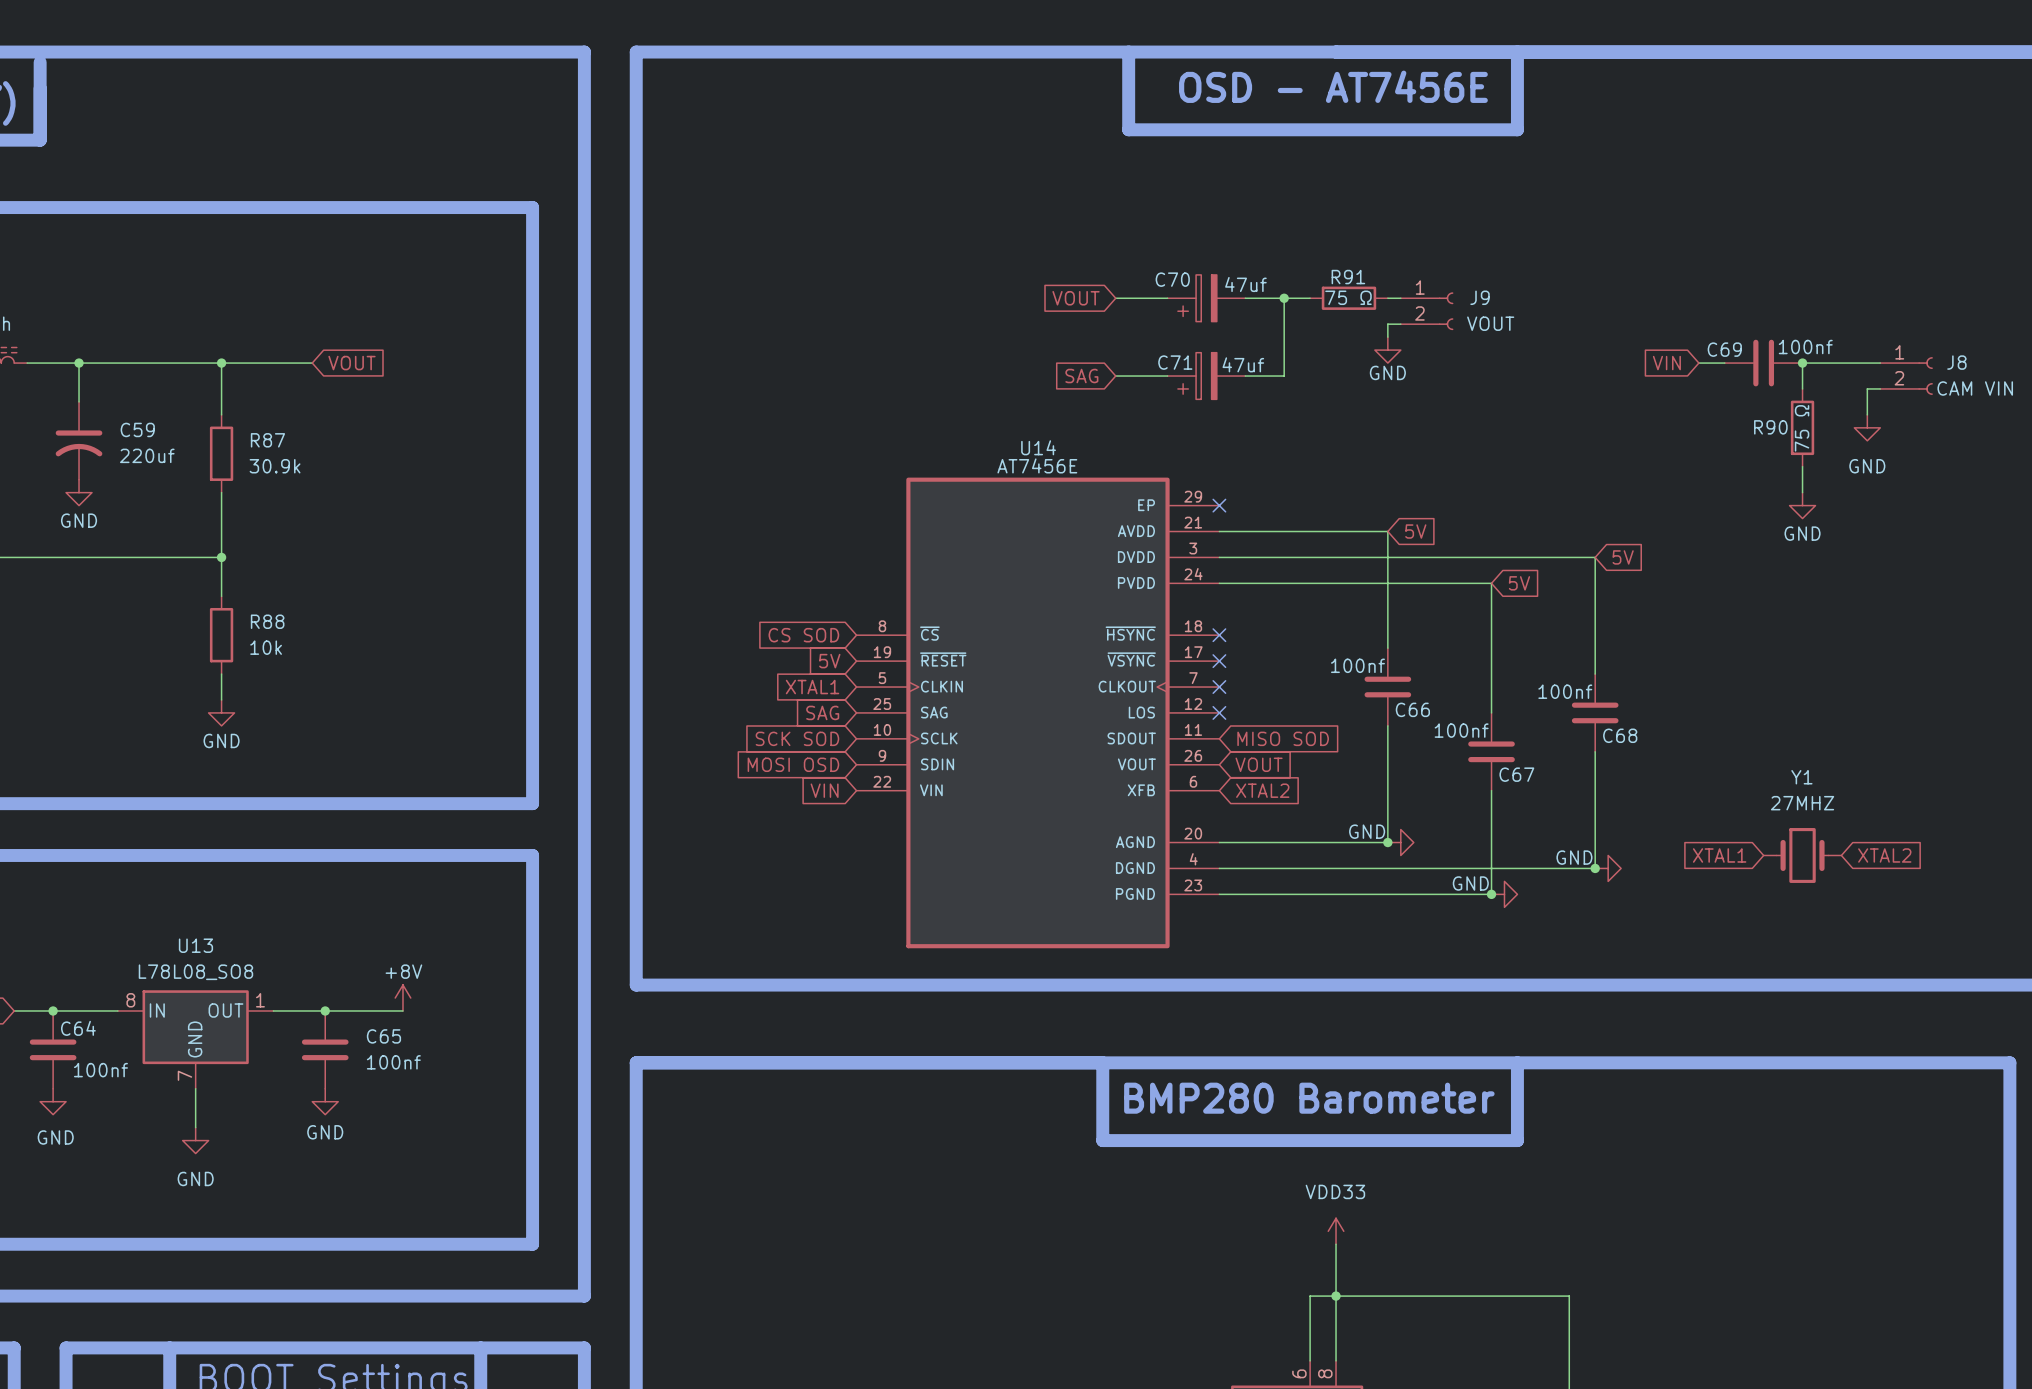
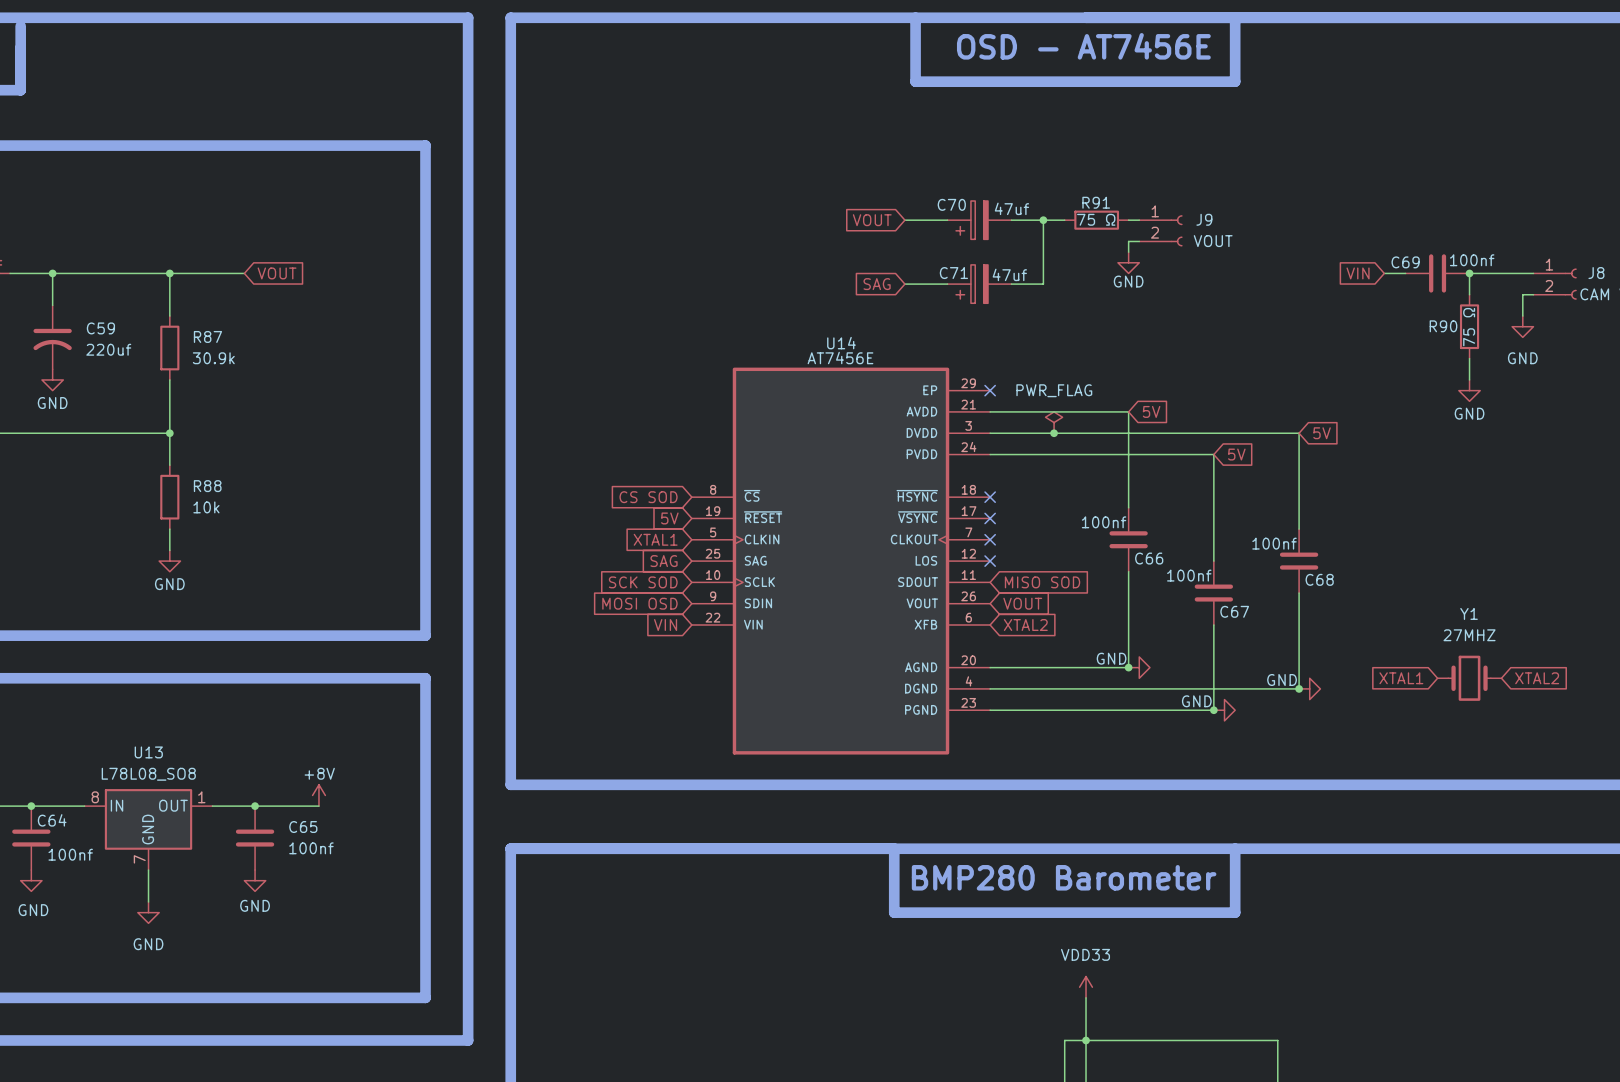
power symbol: none -> PWR_FLAG (1054, 422)
junction: none -> (1054, 433)

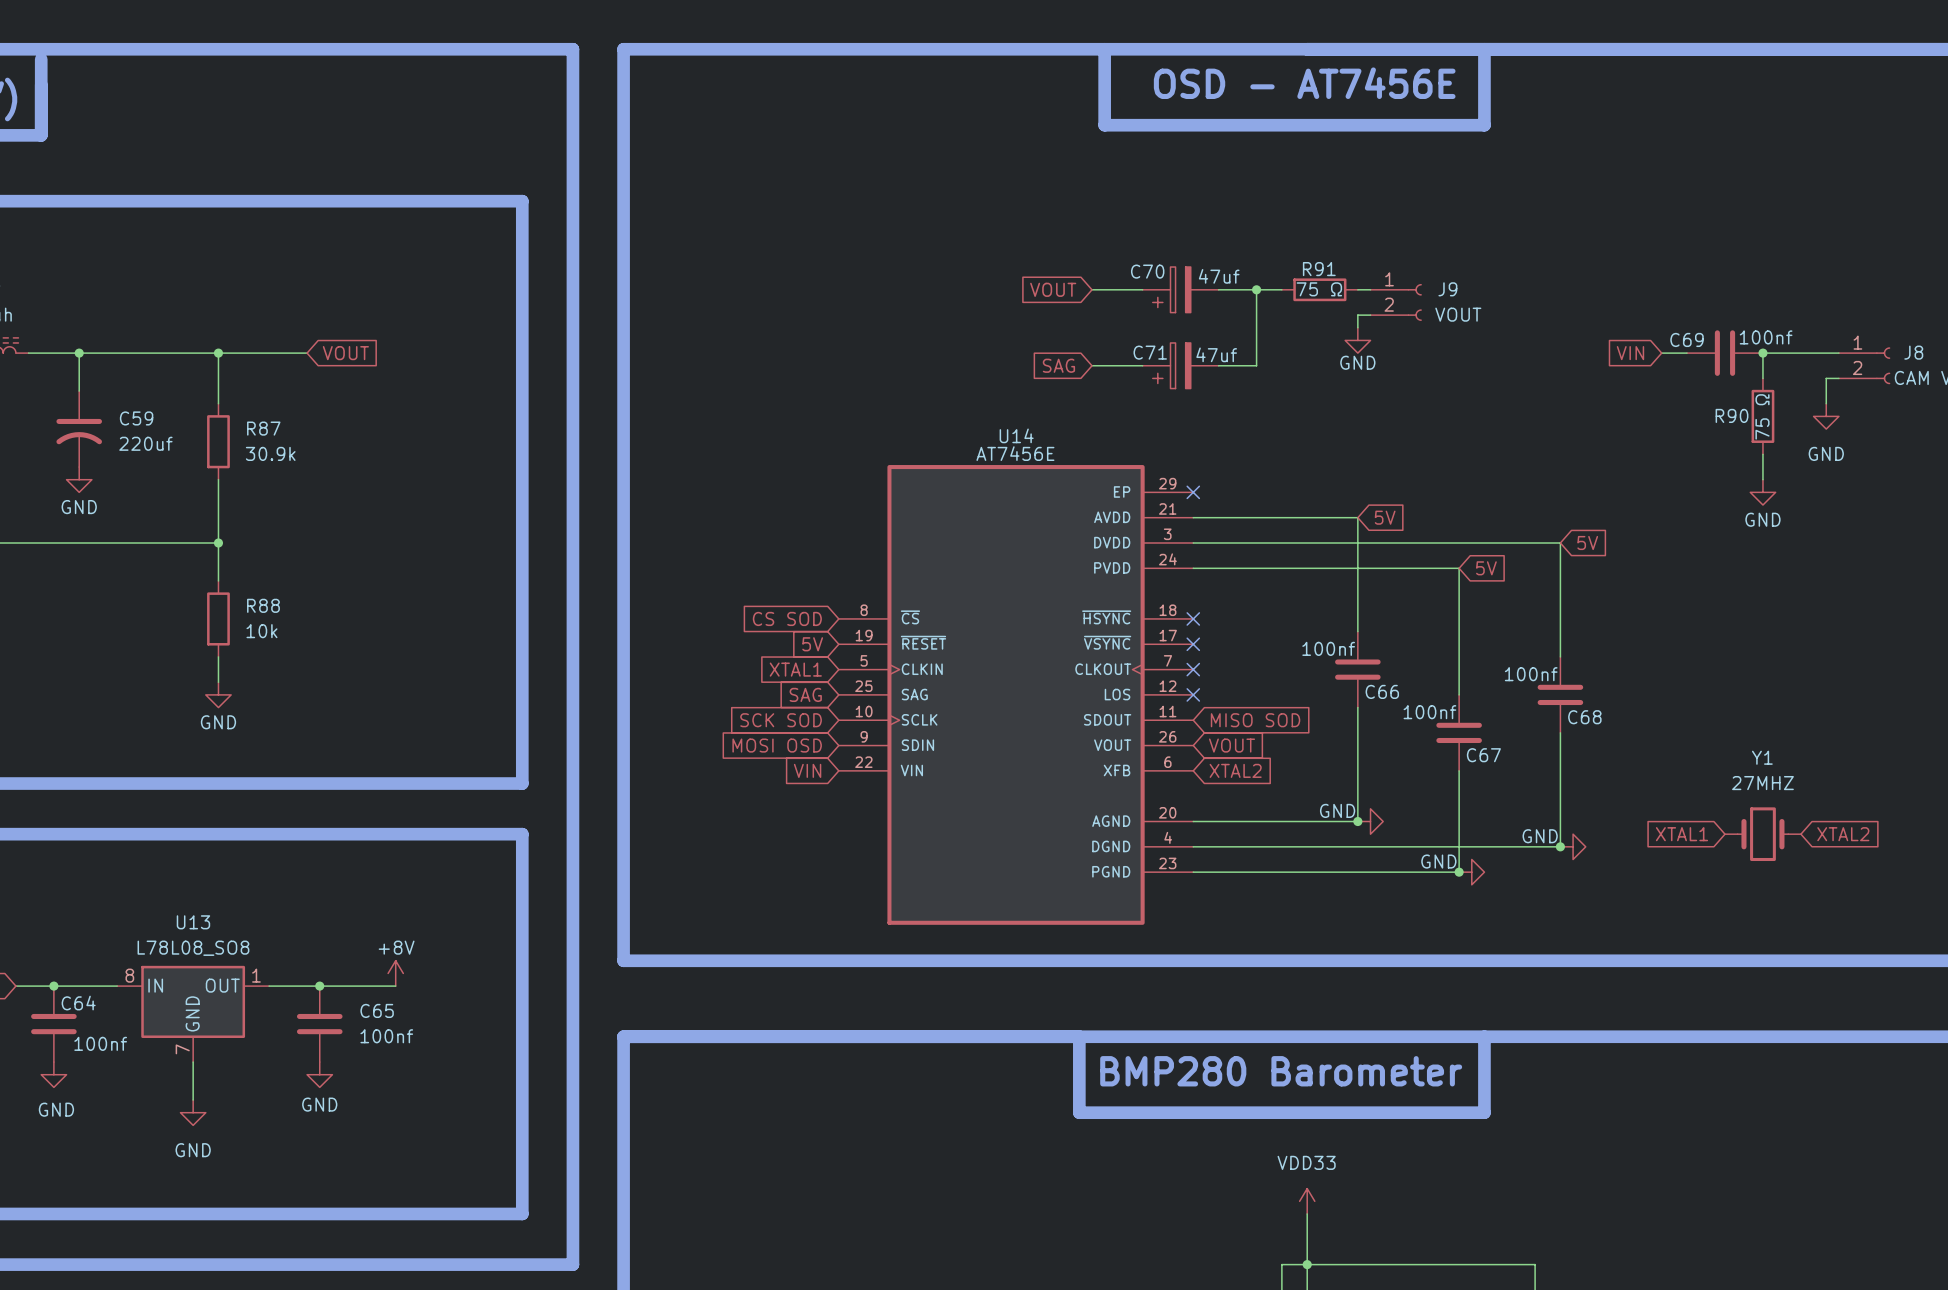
power symbol: PWR_FLAG (1054, 422) -> none
junction: (1054, 433) -> none

